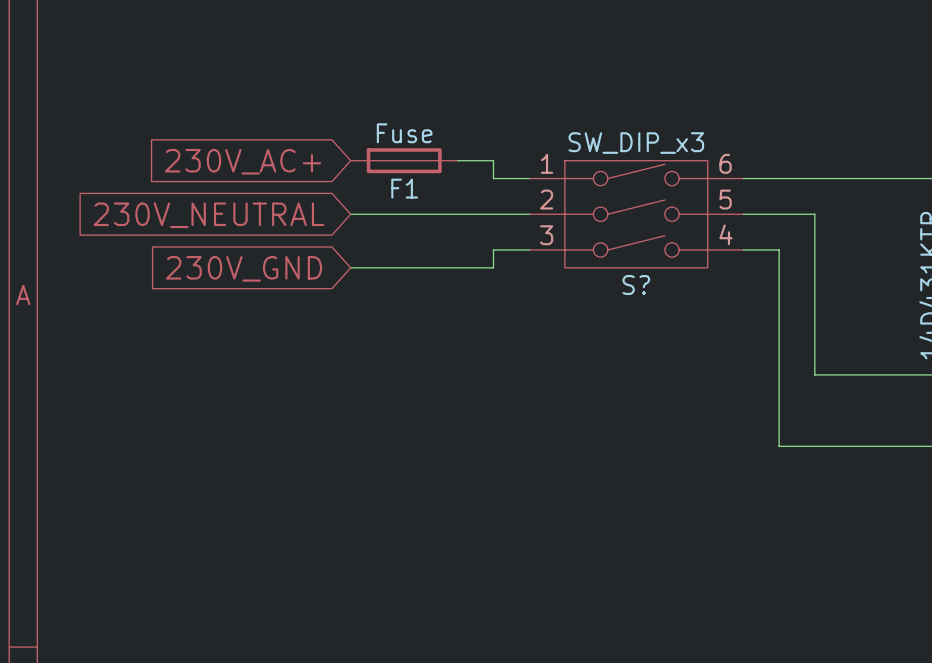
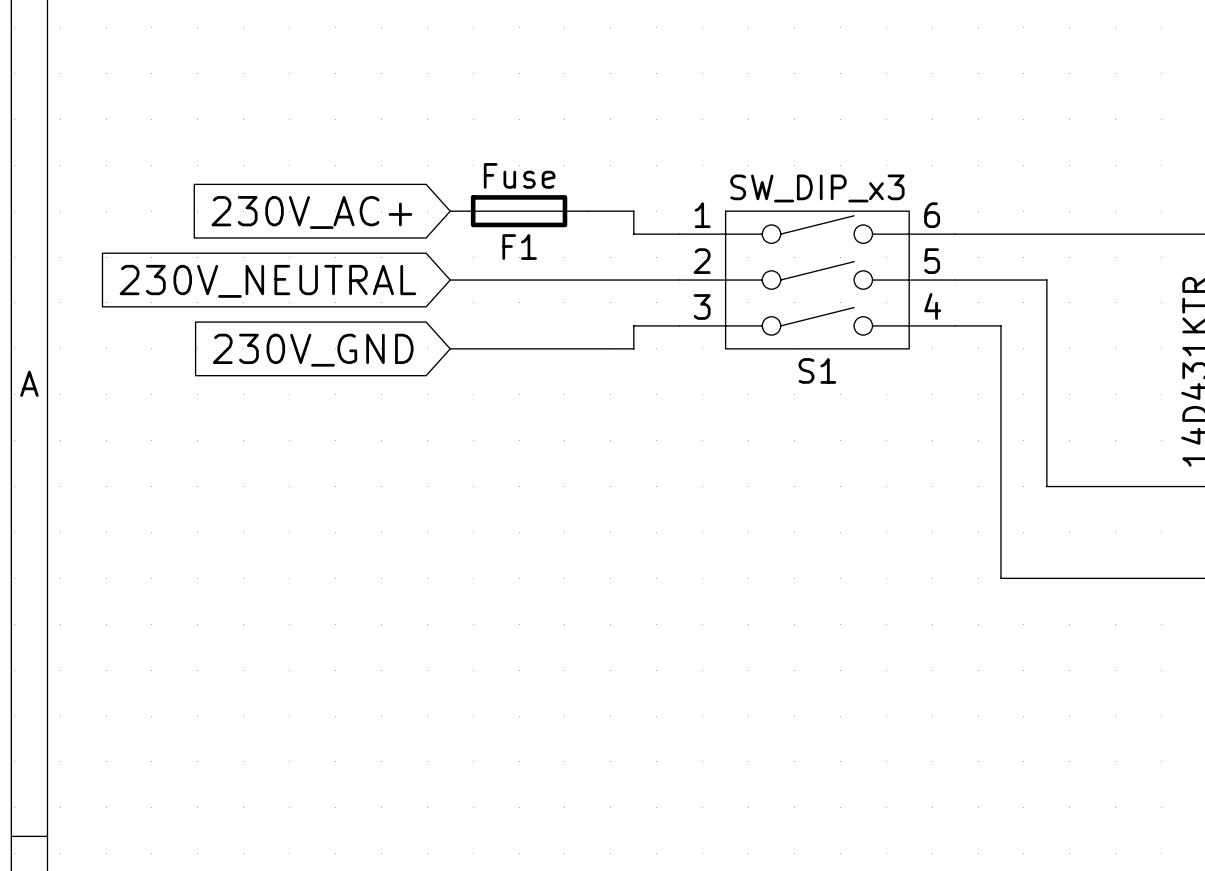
S? name: S? (636, 285) -> S1 (817, 370)

